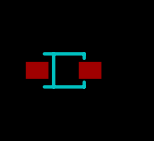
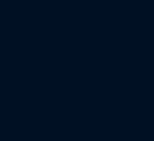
part: (63, 70) -> none

